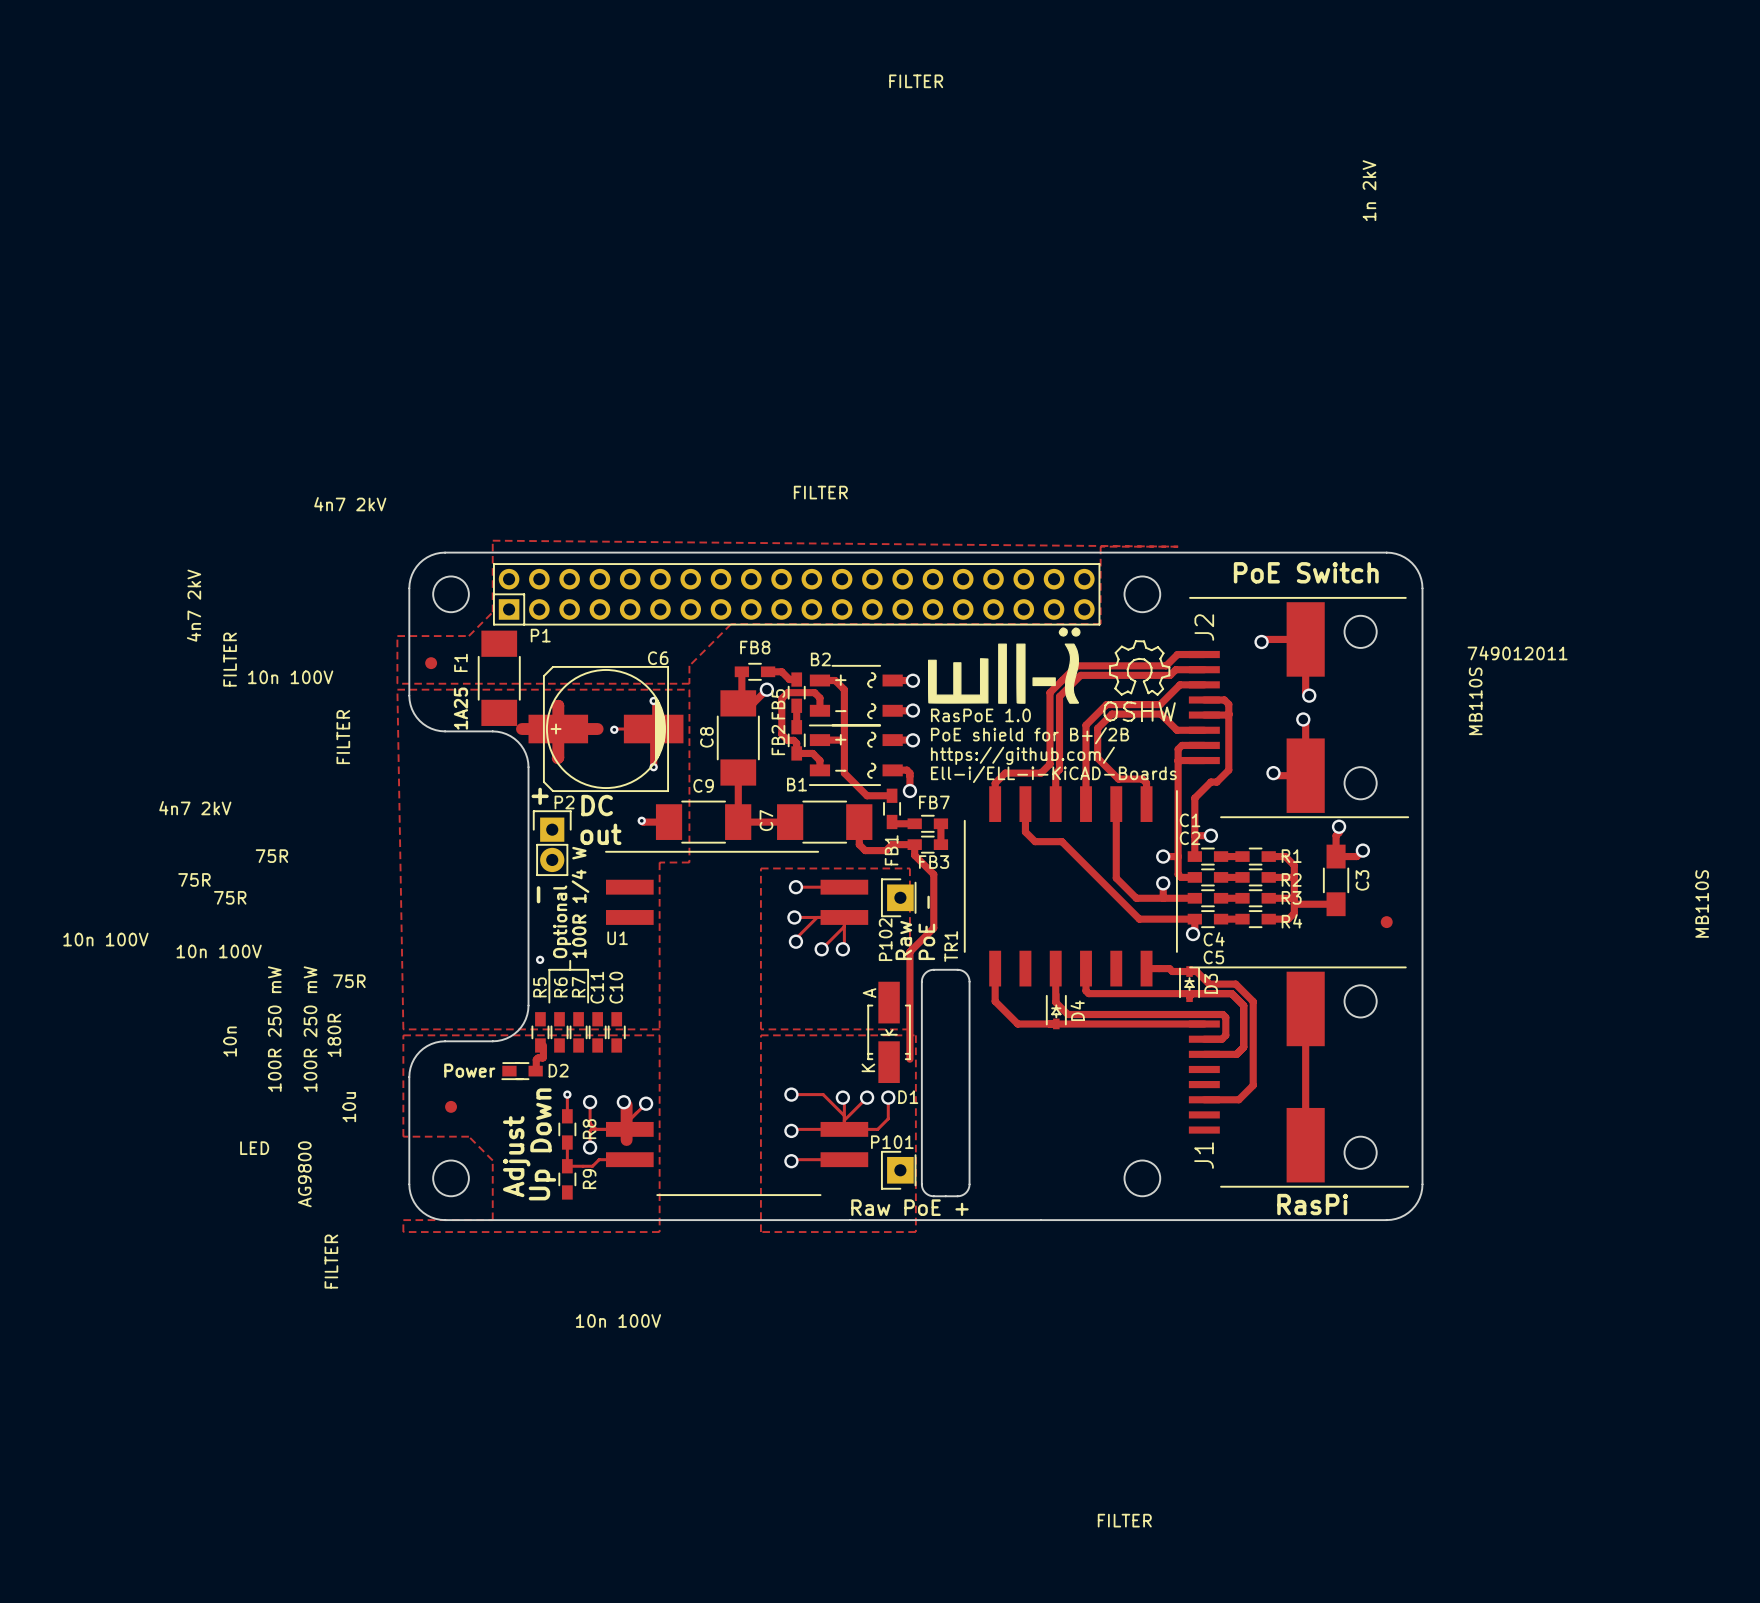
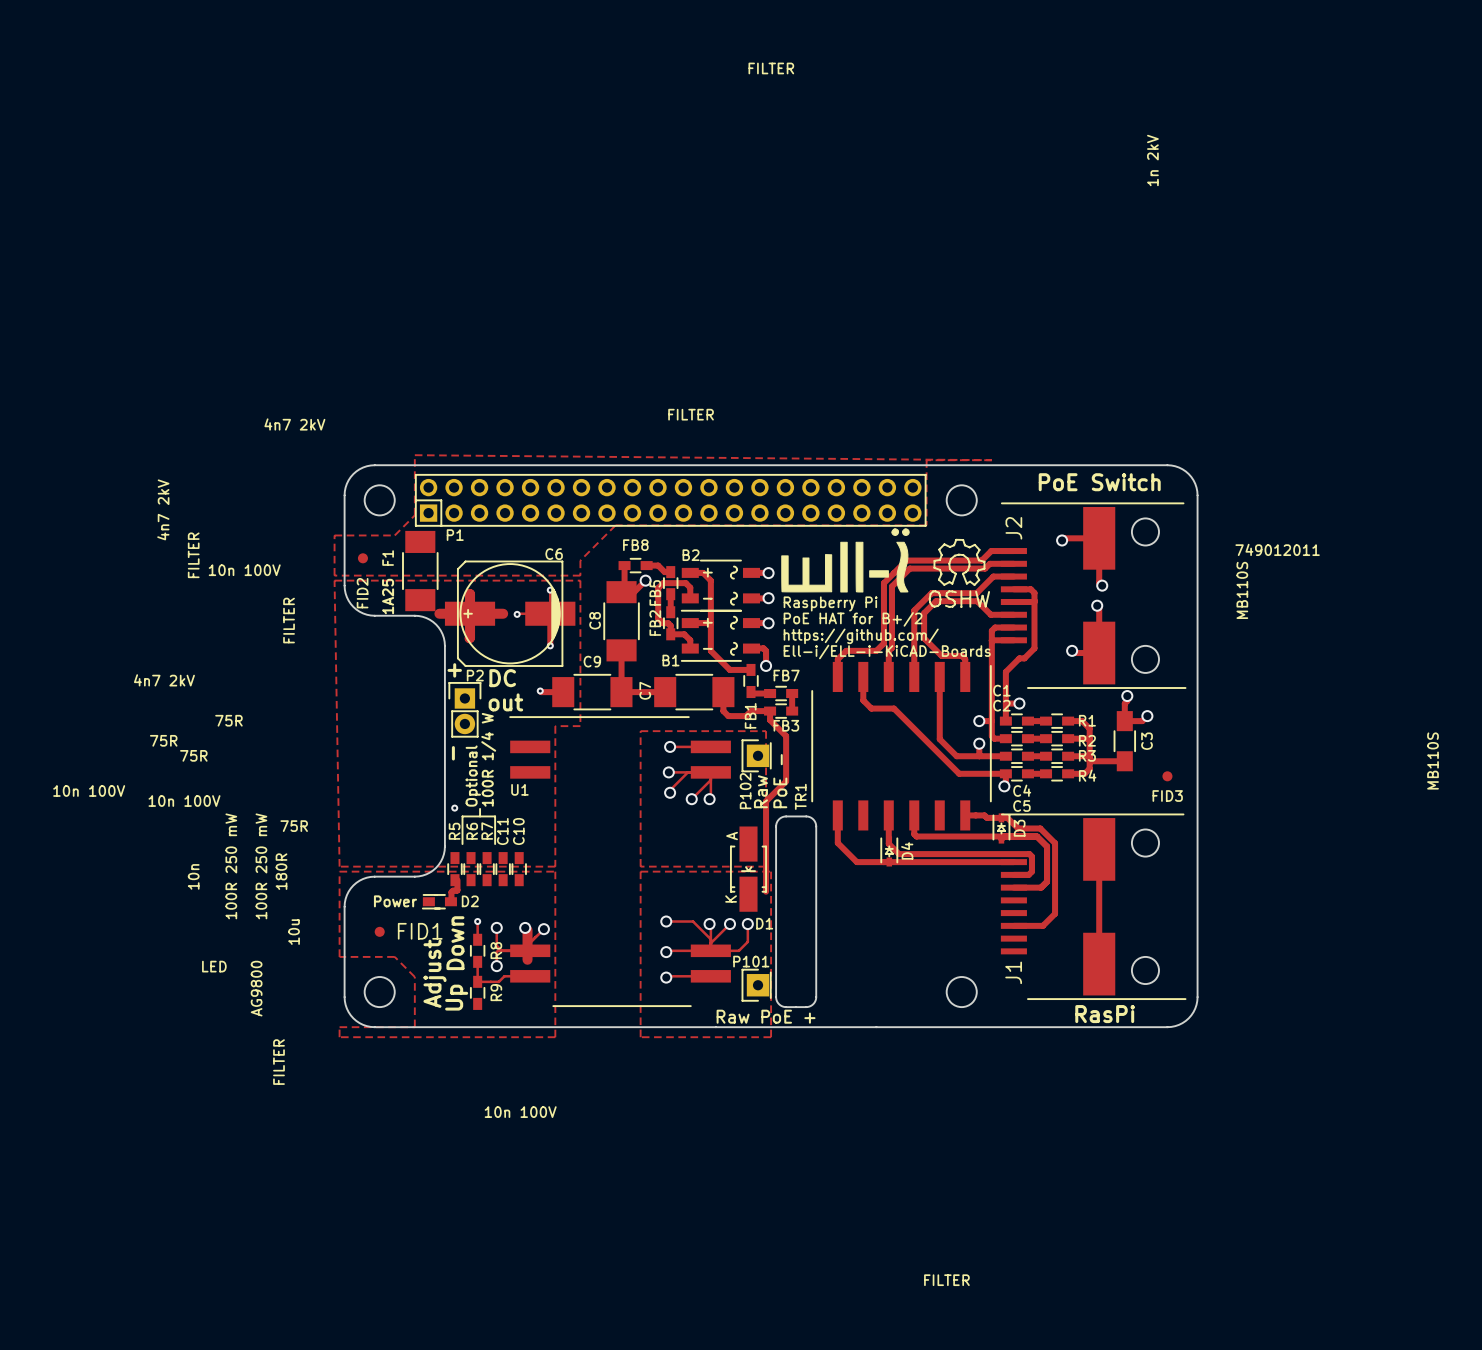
FID2 name: none -> FID2 (362, 593)
text: RasPoE 1.0 (980, 715) -> Raspberry Pi (830, 603)
text: PoE shield for B+/2B (1030, 735) -> PoE HAT for B+/2 (853, 619)
FID3 name: none -> FID3 (1167, 796)
FID1 name: none -> FID1 (420, 931)

